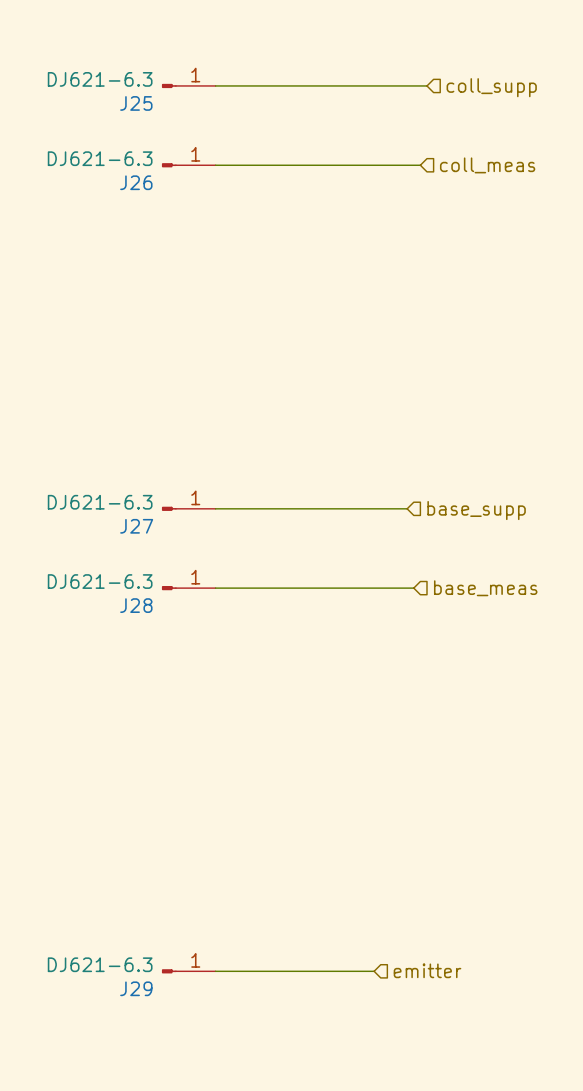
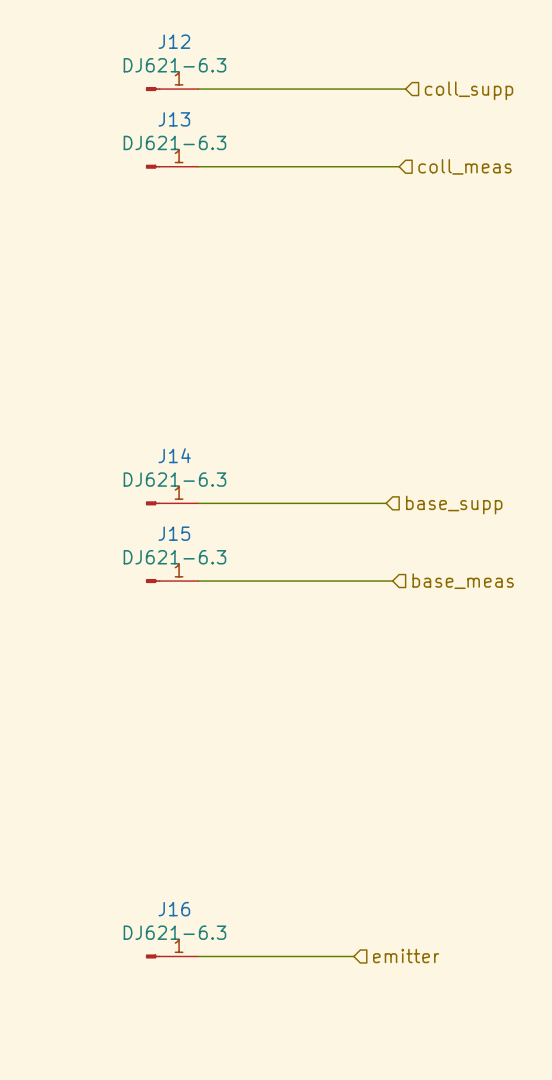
J25 value position: DJ621-6.3 (100, 79) -> DJ621-6.3 (174, 65)
J25 name: J25 (136, 103) -> J12 (174, 41)
J26 value position: DJ621-6.3 (100, 158) -> DJ621-6.3 (174, 142)
J26 name: J26 (136, 182) -> J13 (174, 119)
J27 value position: DJ621-6.3 (100, 502) -> DJ621-6.3 (174, 479)
J27 name: J27 (136, 526) -> J14 (174, 455)
J28 value position: DJ621-6.3 (100, 581) -> DJ621-6.3 (174, 557)
J28 name: J28 (136, 605) -> J15 (174, 533)
J29 value position: DJ621-6.3 (100, 964) -> DJ621-6.3 (174, 932)
J29 name: J29 (136, 988) -> J16 (174, 909)

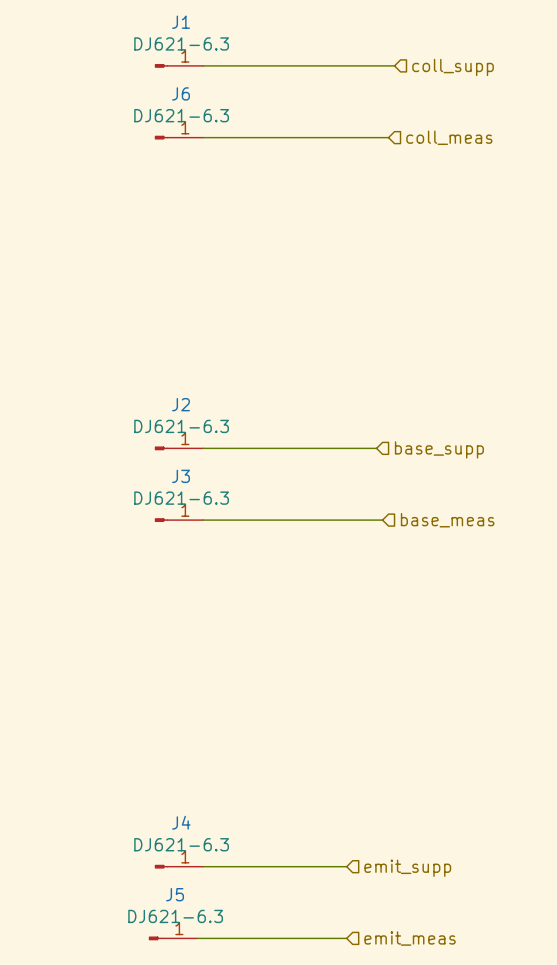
J12 name: J12 (174, 41) -> J1 (181, 22)
J13 name: J13 (174, 119) -> J6 (181, 93)
J14 name: J14 (174, 455) -> J2 (181, 404)
J15 name: J15 (174, 533) -> J3 (181, 476)
J16 name: J16 (174, 909) -> J4 (181, 822)
hierarchical label: emitter (406, 956) -> emit_supp (407, 868)
J5: none -> DJ621-6.3 (173, 938)
wire: none -> (197, 938) (346, 938)
hierarchical label: none -> emit_meas (410, 938)

